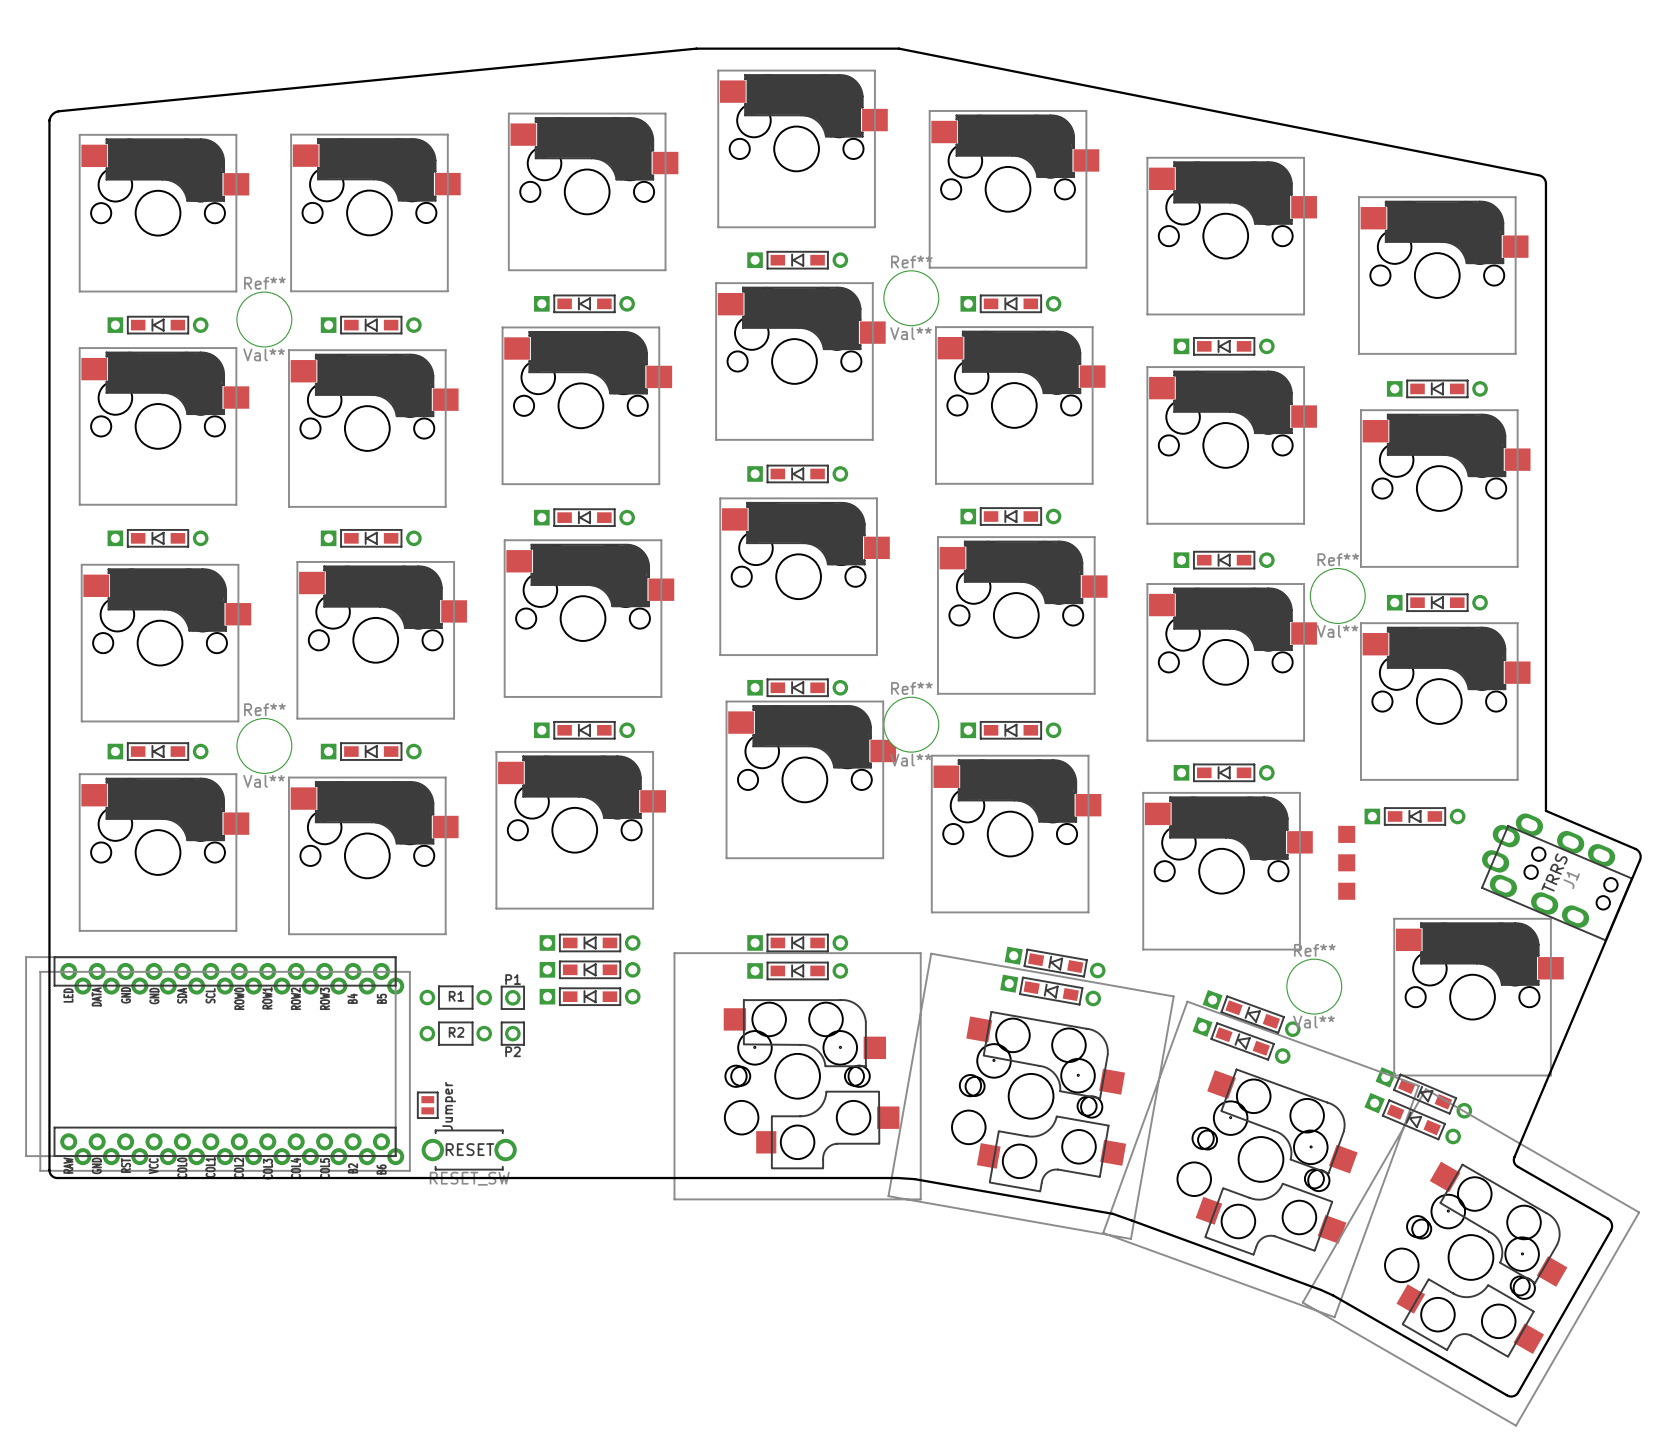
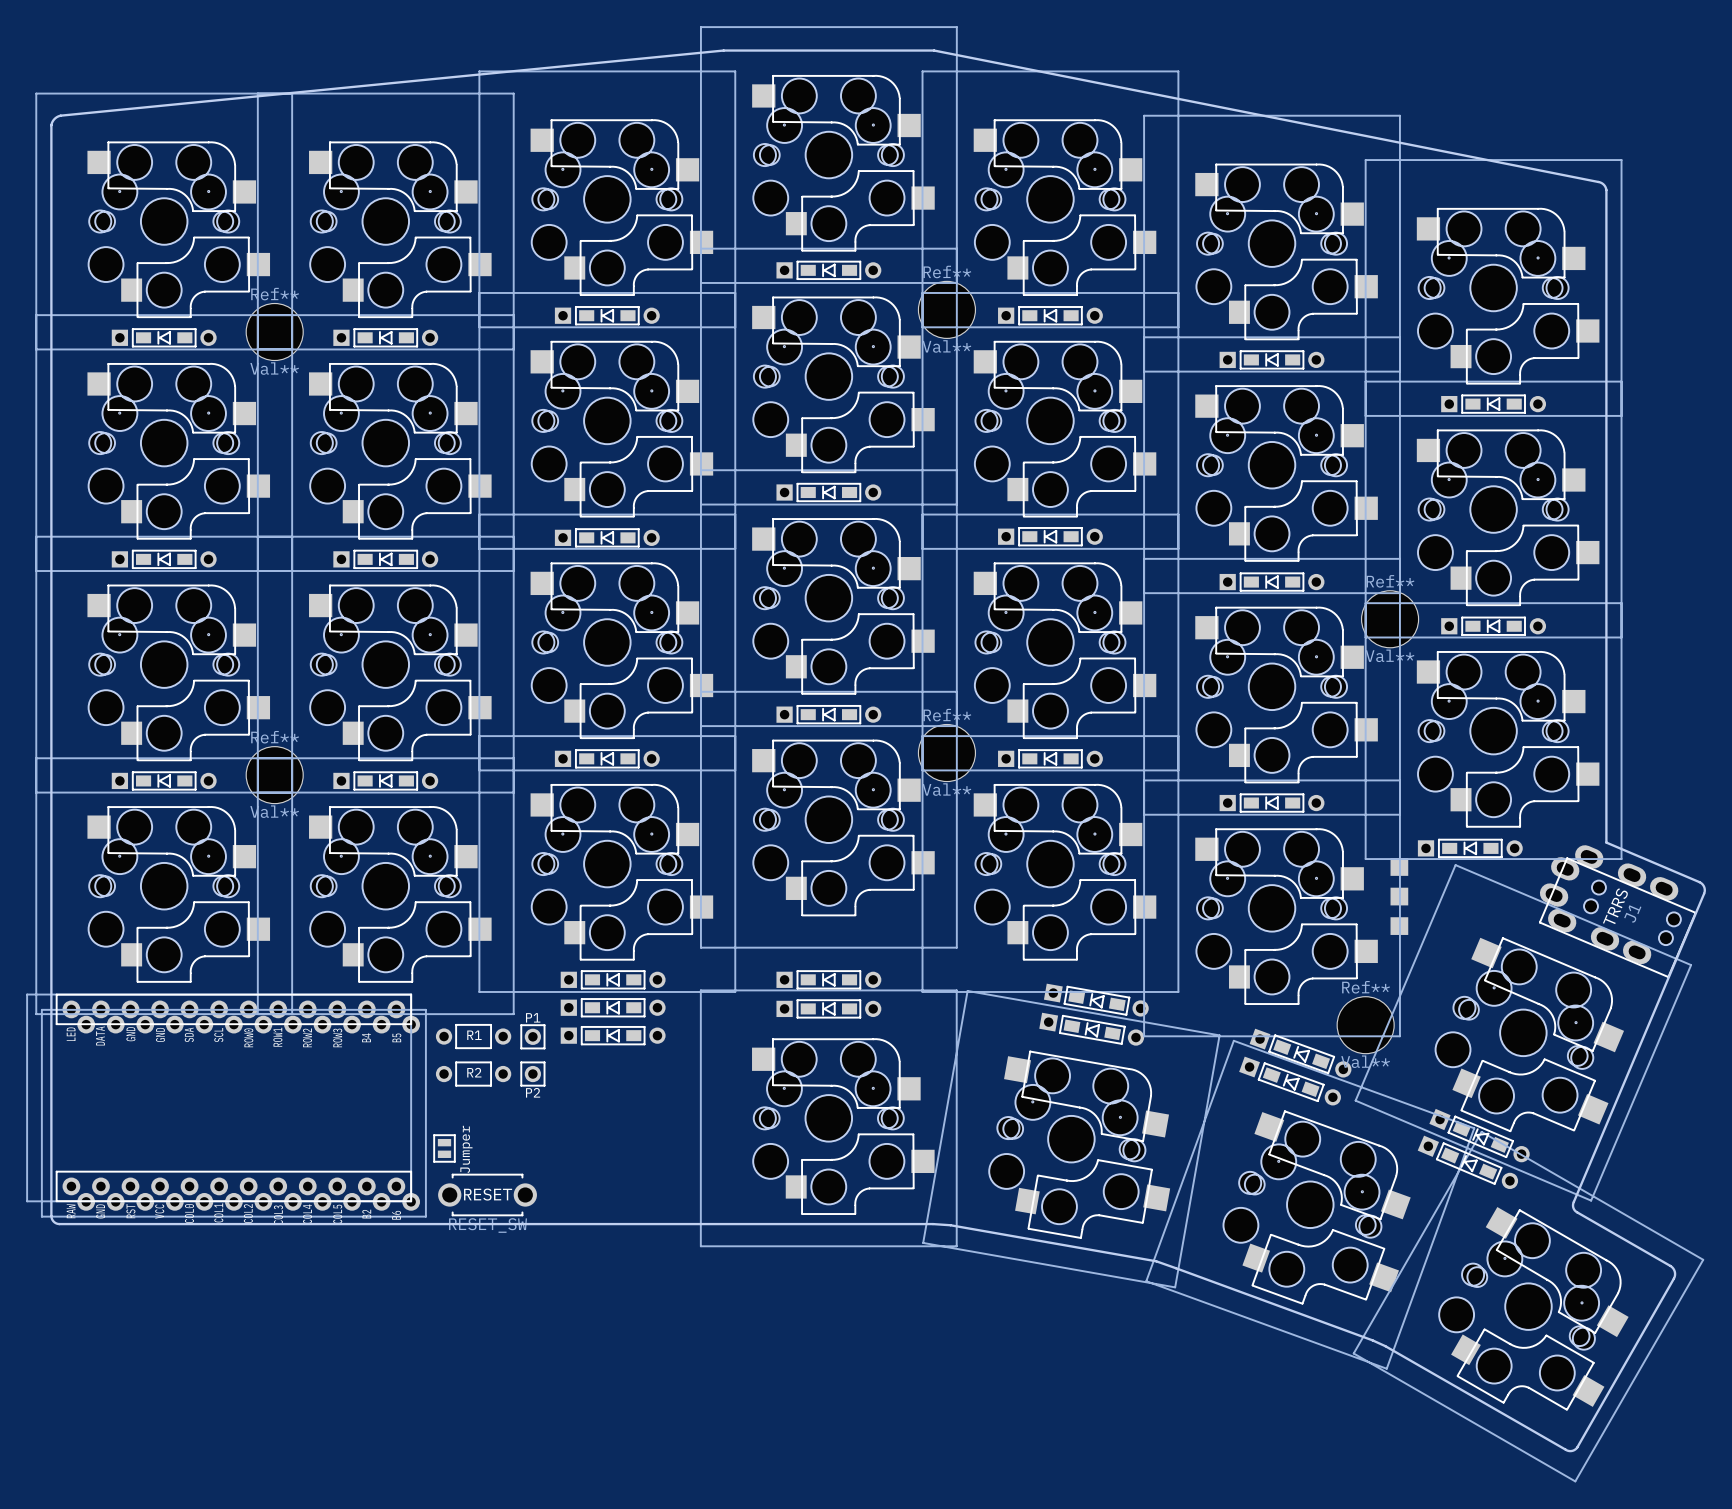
part footprint: [717, 69, 888, 229] -> [700, 26, 958, 284]
part footprint: [928, 110, 1100, 269] -> [921, 70, 1180, 329]
part footprint: [507, 112, 679, 272] -> [478, 70, 737, 329]
part footprint: [78, 133, 250, 293] -> [35, 92, 294, 351]
part footprint: [290, 133, 461, 293] -> [256, 92, 515, 351]
part footprint: [1146, 156, 1317, 316] -> [1143, 114, 1401, 373]
part footprint: [1358, 196, 1529, 355] -> [1364, 159, 1623, 417]
part footprint: [715, 282, 886, 441] -> [700, 247, 958, 506]
part footprint: [501, 326, 673, 486] -> [478, 292, 737, 550]
part footprint: [935, 326, 1106, 485] -> [921, 292, 1180, 550]
part footprint: [78, 347, 250, 506] -> [35, 314, 294, 572]
part footprint: [288, 349, 459, 508] -> [256, 314, 515, 572]
part footprint: [1146, 366, 1317, 525] -> [1143, 336, 1401, 595]
part footprint: [1360, 409, 1531, 568] -> [1364, 380, 1623, 639]
part footprint: [719, 497, 890, 656] -> [700, 469, 958, 727]
part footprint: [503, 539, 675, 698] -> [478, 513, 737, 772]
part footprint: [296, 561, 467, 720] -> [256, 535, 515, 794]
part footprint: [80, 563, 252, 723] -> [35, 535, 294, 794]
part footprint: [1146, 583, 1317, 742] -> [1143, 557, 1401, 816]
part: (1022, 615) -> none
part: none -> (1050, 642)
part footprint: [1360, 622, 1531, 781] -> [1364, 602, 1623, 860]
part footprint: [495, 751, 666, 910] -> [478, 735, 737, 993]
part footprint: [930, 754, 1102, 914] -> [921, 735, 1180, 993]
part footprint: [78, 773, 250, 932] -> [35, 757, 294, 1016]
part footprint: [288, 776, 459, 936] -> [256, 757, 515, 1016]
part: (810, 779) -> none
part: none -> (828, 819)
part footprint: [1142, 792, 1313, 951] -> [1143, 779, 1401, 1038]
part: none -> (1523, 1032)
part: (1478, 997) -> none

